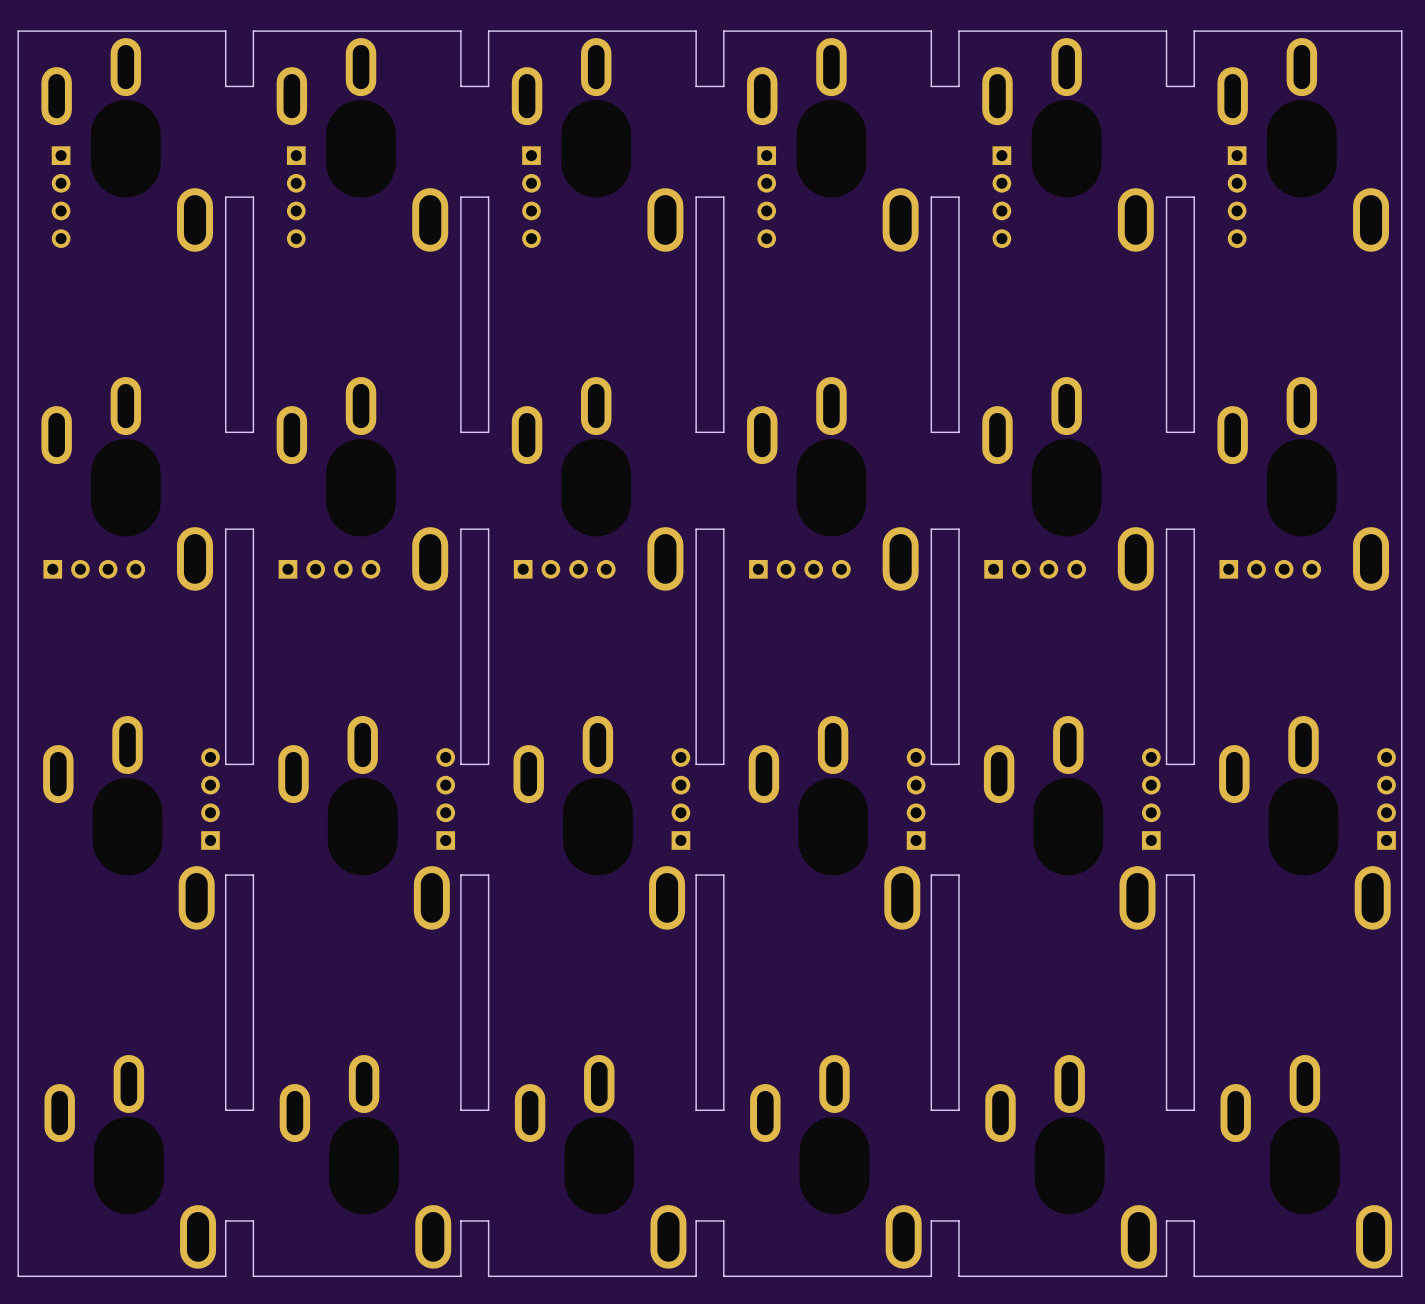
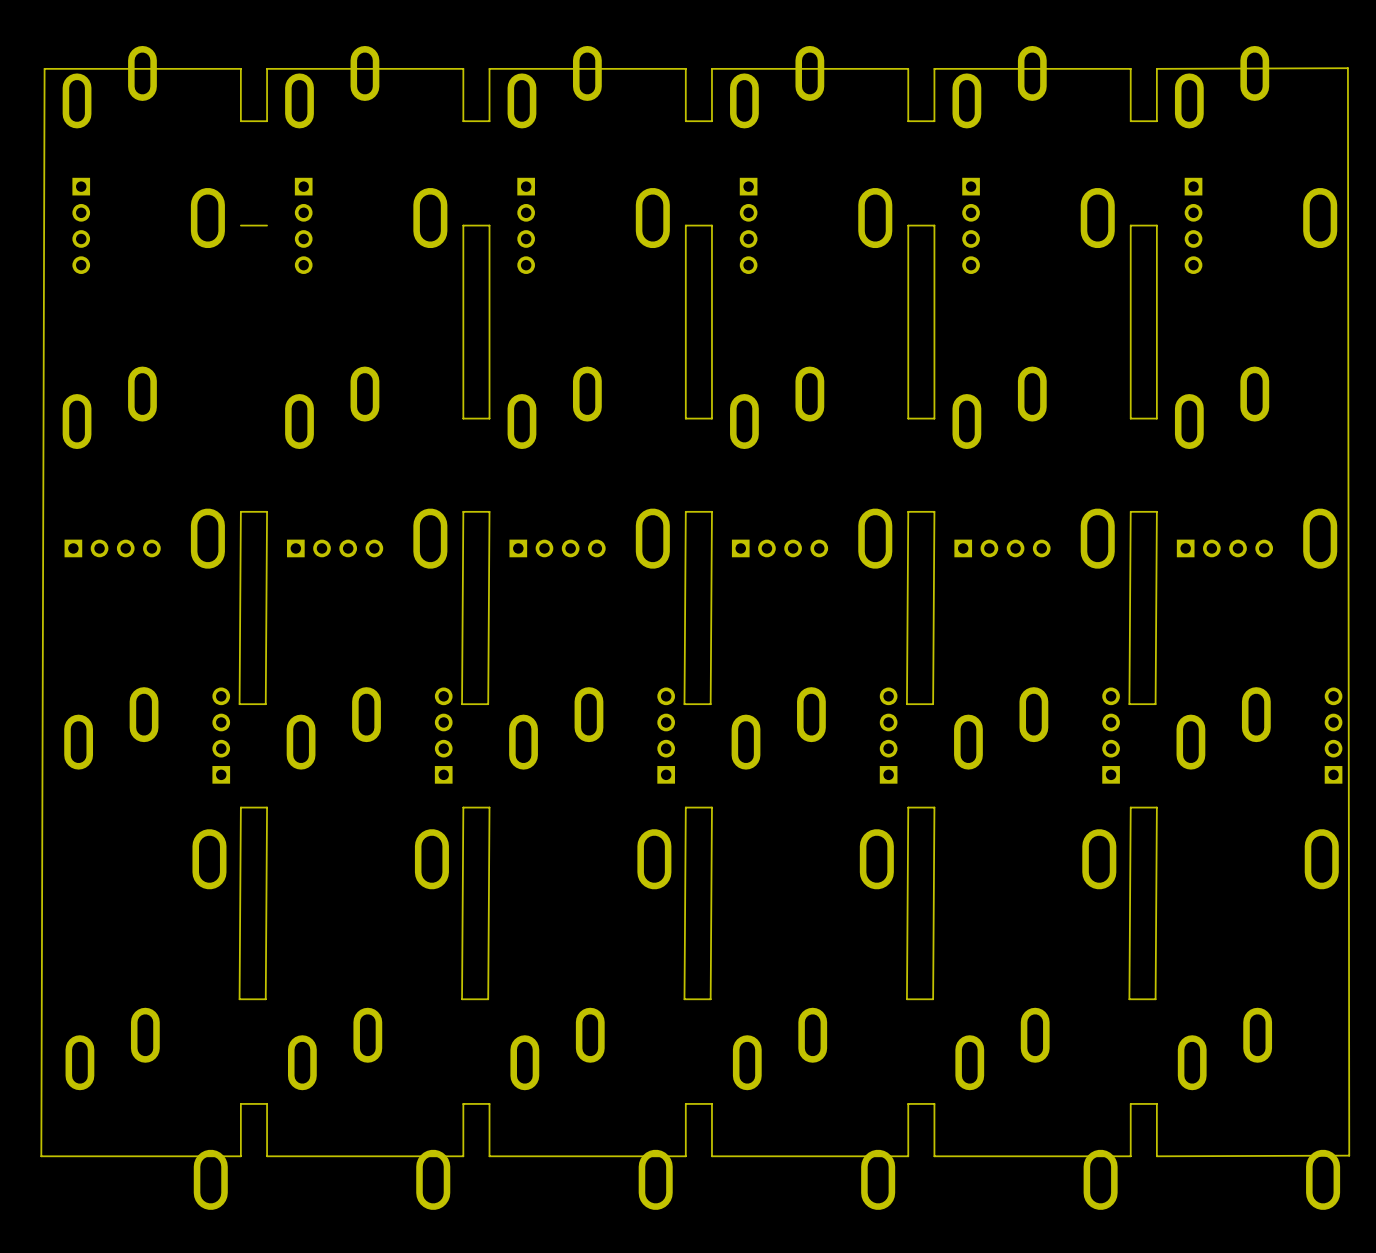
board edge: (1401, 31) (1194, 31) (1194, 86) (1166, 86) (1166, 31) (959, 31) (959, 86) (931, 86) (931, 31) (723, 31) (723, 86) (696, 86) (696, 31) (488, 31) (488, 86) (460, 86) (460, 31) (253, 31) (253, 86) (225, 86) (225, 31) (18, 31) (18, 1276) (225, 1276) (225, 1220) (253, 1220) (253, 1276) (460, 1276) (460, 1220) (488, 1220) (488, 1276) (696, 1276) (696, 1220) (723, 1220) (723, 1276) (931, 1276) (931, 1220) (959, 1220) (959, 1276) (1166, 1276) (1166, 1220) (1194, 1220) (1194, 1276) (1401, 1276) (1401, 31) -> (1347, 68) (1349, 1155) (1156, 1156) (1156, 1103) (1130, 1103) (1130, 1156) (934, 1156) (934, 1103) (908, 1103) (908, 1156) (711, 1156) (711, 1103) (685, 1103) (685, 1156) (489, 1156) (489, 1103) (463, 1103) (463, 1156) (267, 1156) (267, 1103) (240, 1103) (240, 1156) (41, 1156) (44, 68) (240, 68) (240, 121) (267, 121) (267, 68) (463, 68) (463, 121) (489, 121) (489, 68) (685, 68) (685, 121) (711, 121) (711, 68) (908, 68) (908, 121) (934, 121) (934, 68) (1130, 68) (1130, 121) (1156, 121) (1156, 68) (1347, 68)
part position: (61, 197) -> (81, 225)
board edge: (253, 197) (253, 432) (225, 432) (225, 197) (253, 197) -> none
part position: (296, 197) -> (303, 225)
board edge: (488, 197) (488, 432) (460, 432) (460, 197) (488, 197) -> (489, 225) (489, 418) (463, 418) (463, 225) (489, 225)
part position: (531, 197) -> (526, 225)
board edge: (723, 197) (723, 432) (696, 432) (696, 197) (723, 197) -> (711, 225) (711, 418) (685, 418) (685, 225) (711, 225)
part position: (766, 197) -> (748, 225)
board edge: (959, 197) (959, 432) (931, 432) (931, 197) (959, 197) -> (934, 225) (934, 418) (908, 418) (908, 225) (934, 225)
part position: (1001, 197) -> (971, 225)
board edge: (1194, 197) (1166, 197) (1166, 432) (1194, 432) (1194, 197) -> (1156, 225) (1156, 418) (1130, 418) (1130, 225) (1156, 225)
part position: (1237, 197) -> (1193, 225)
board edge: none -> (267, 225) (240, 225)
board edge: (253, 529) (253, 764) (225, 764) (225, 529) (253, 529) -> (267, 511) (265, 704) (239, 704) (240, 511) (267, 511)
board edge: (488, 529) (460, 529) (460, 764) (488, 764) (488, 529) -> (489, 511) (488, 704) (462, 704) (463, 511) (489, 511)
board edge: (723, 529) (723, 764) (696, 764) (696, 529) (723, 529) -> (711, 511) (710, 704) (684, 704) (685, 511) (711, 511)
board edge: (959, 529) (959, 764) (931, 764) (931, 529) (959, 529) -> (934, 511) (933, 704) (906, 704) (908, 511) (934, 511)
board edge: (1194, 529) (1166, 529) (1166, 764) (1194, 764) (1194, 529) -> (1156, 511) (1155, 704) (1129, 704) (1130, 511) (1156, 511)
part position: (210, 798) -> (221, 735)
part position: (445, 798) -> (443, 735)
part position: (680, 798) -> (666, 735)
part position: (916, 798) -> (888, 735)
part position: (1151, 798) -> (1111, 735)
part position: (1386, 798) -> (1333, 735)
board edge: (253, 875) (253, 1110) (225, 1110) (225, 875) (253, 875) -> (267, 807) (265, 999) (239, 999) (240, 807) (267, 807)
board edge: (488, 875) (460, 875) (460, 1110) (488, 1110) (488, 875) -> (489, 807) (488, 999) (462, 999) (463, 807) (489, 807)
board edge: (723, 875) (723, 1110) (696, 1110) (696, 875) (723, 875) -> (711, 807) (710, 999) (684, 999) (685, 807) (711, 807)
board edge: (959, 875) (931, 875) (931, 1110) (959, 1110) (959, 875) -> (934, 807) (933, 999) (906, 999) (908, 807) (934, 807)
board edge: (1194, 875) (1166, 875) (1166, 1110) (1194, 1110) (1194, 875) -> (1156, 807) (1155, 999) (1129, 999) (1130, 807) (1156, 807)

